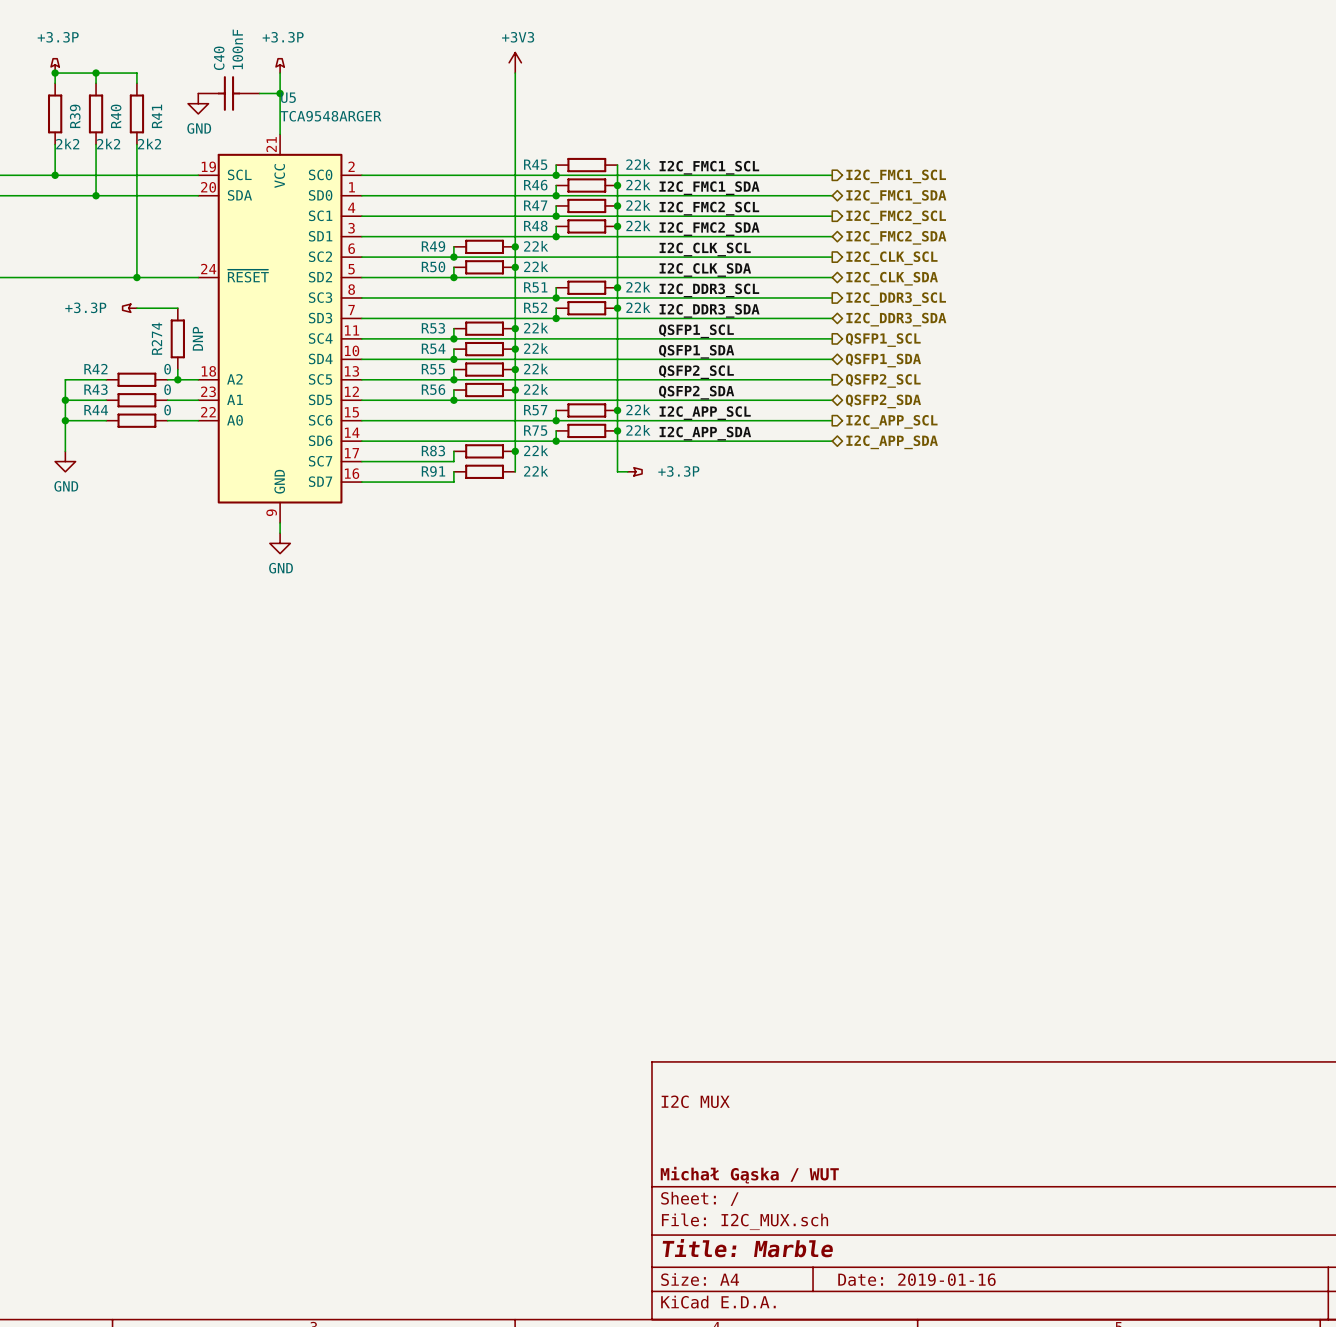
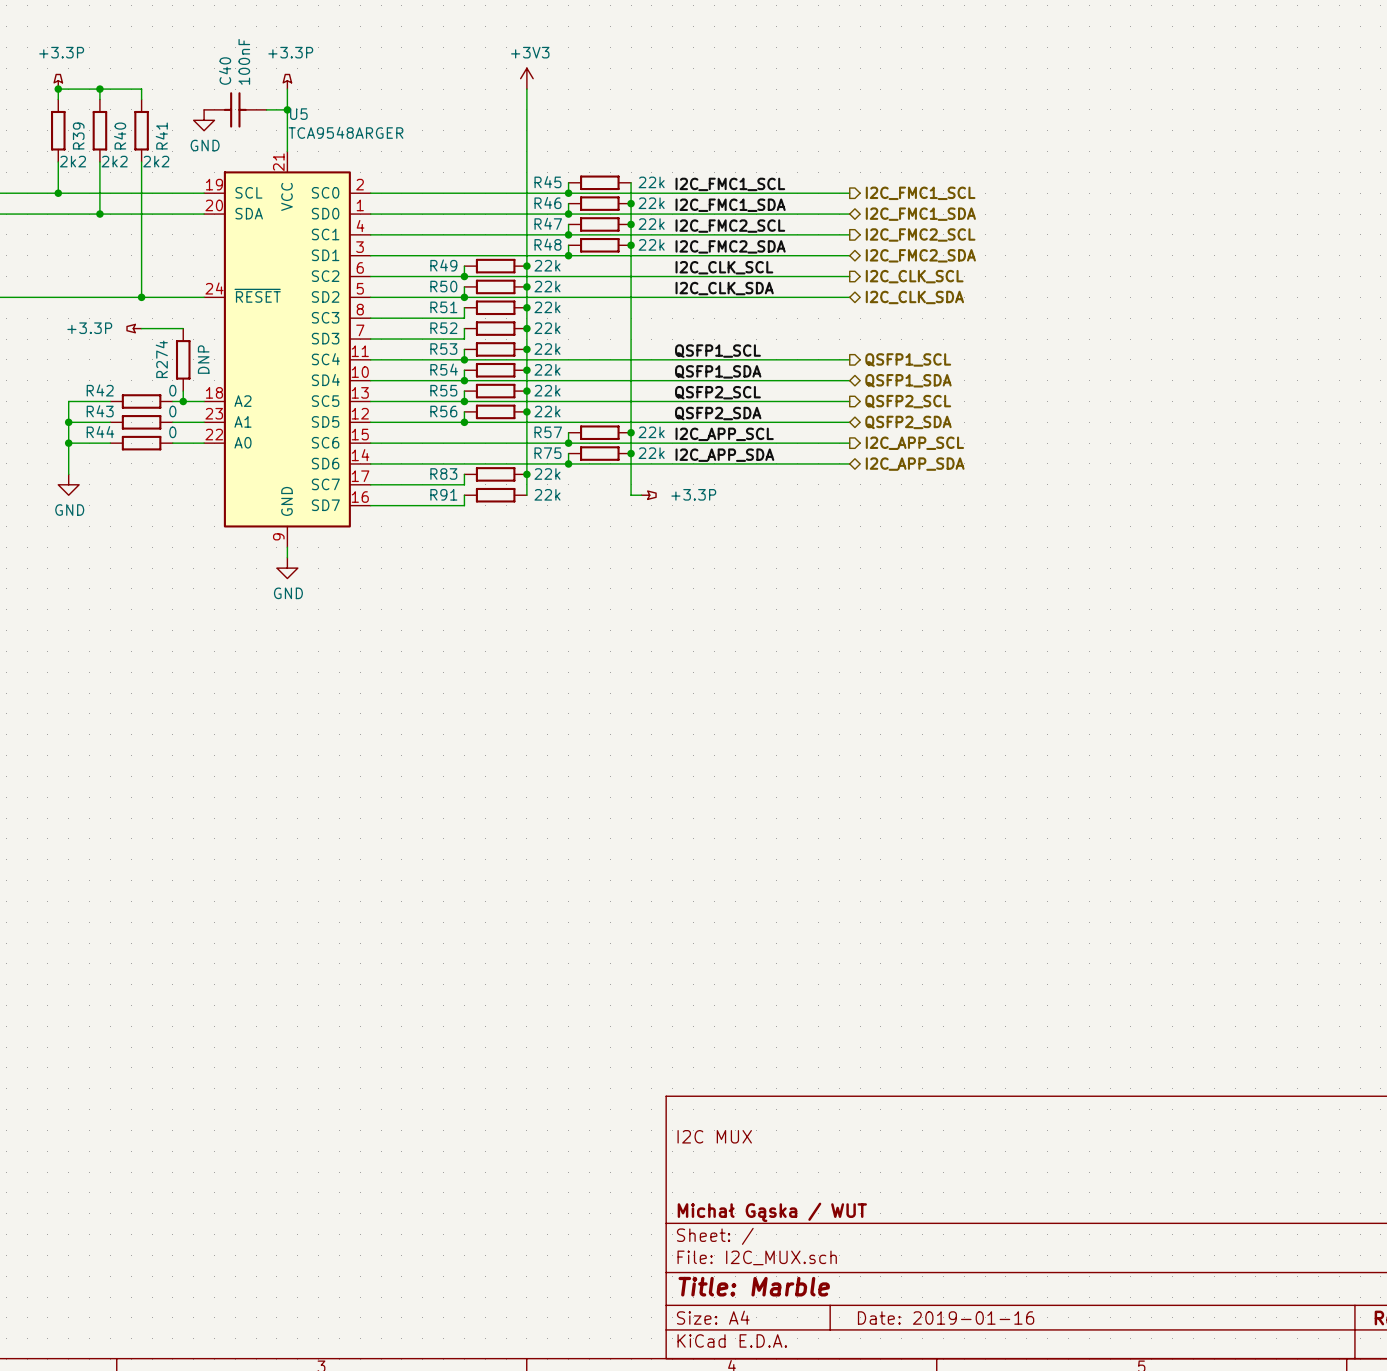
junction: none -> (526, 307)
wire: (556, 287) (556, 297) -> none
R51 position: (586, 287) -> (495, 307)
junction: (617, 287) -> none
label: I2C_DDR3_SCL (709, 290) -> none
wire: (453, 297) (832, 297) -> (464, 318) (464, 307)
junction: (556, 297) -> none
hierarchical label: I2C_DDR3_SCL (896, 299) -> none
junction: none -> (526, 328)
wire: (556, 308) (556, 318) -> none
R52 position: (586, 308) -> (495, 328)
junction: (617, 308) -> none
label: I2C_DDR3_SDA (709, 310) -> none
wire: (453, 318) (832, 318) -> (464, 339) (464, 328)
junction: (556, 318) -> none
hierarchical label: I2C_DDR3_SDA (896, 319) -> none

